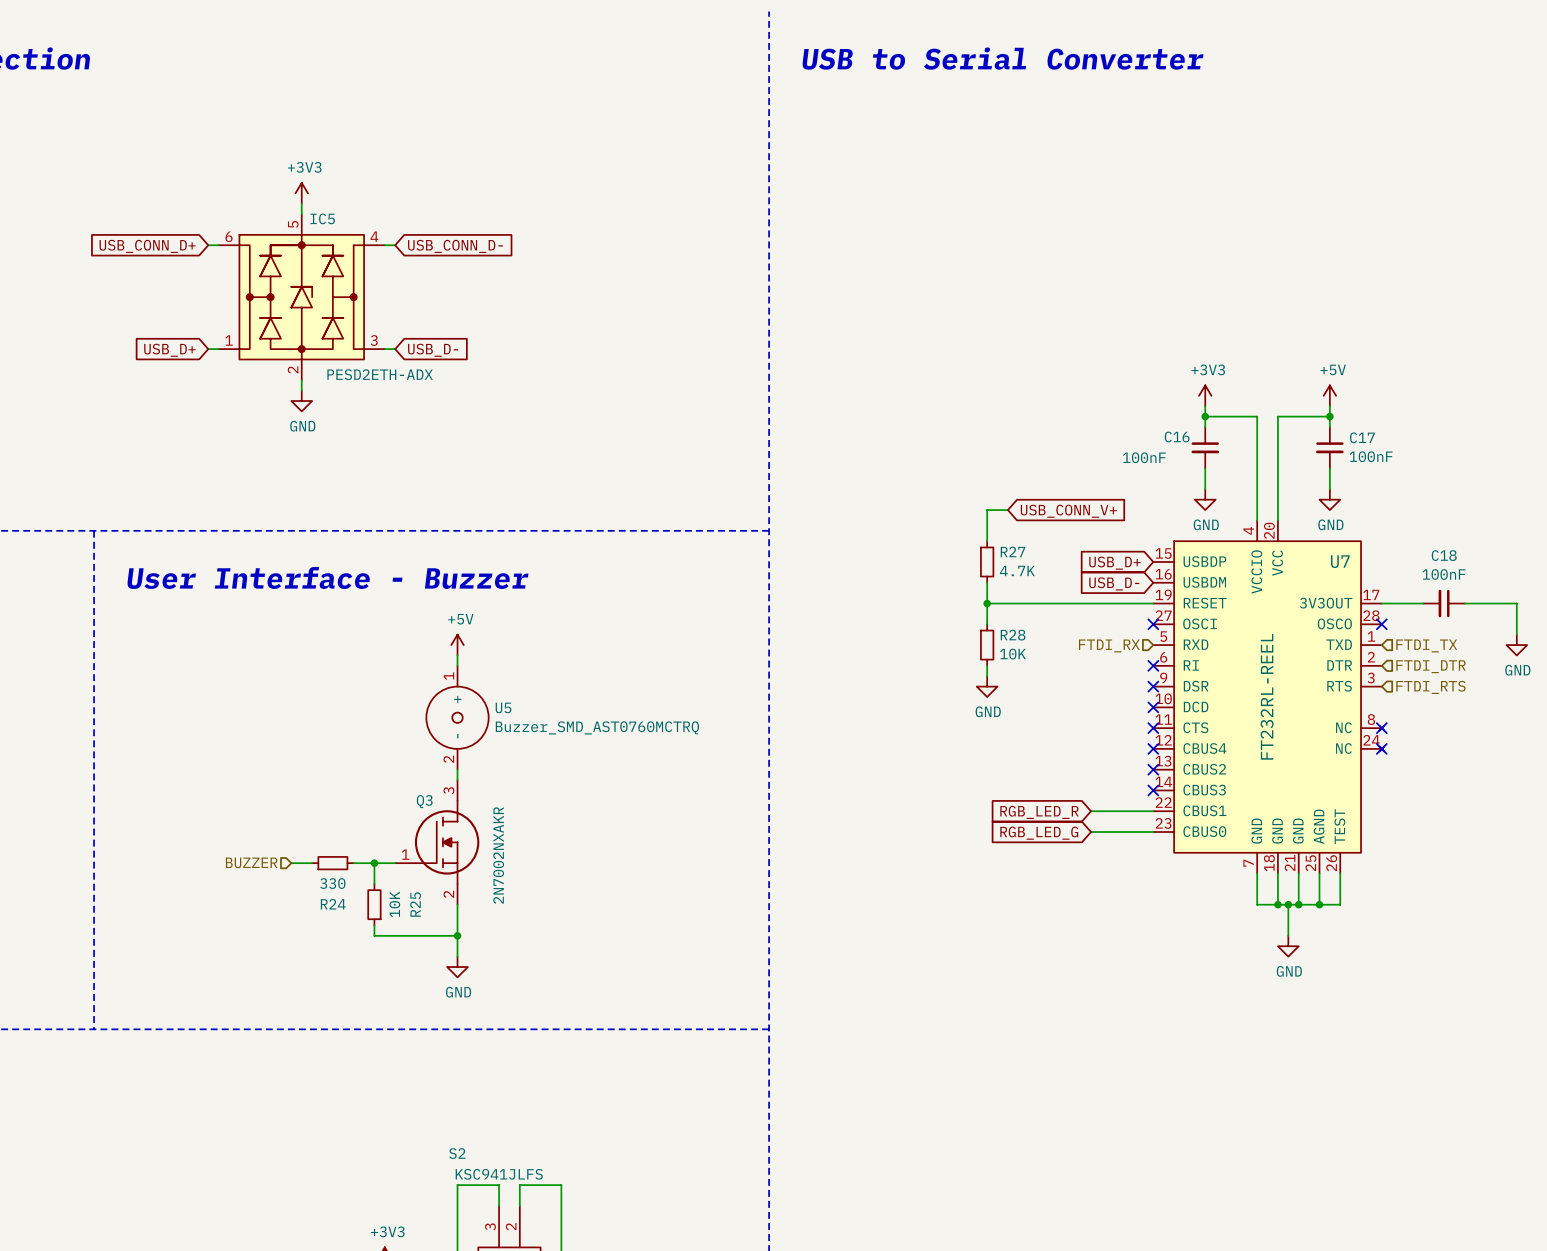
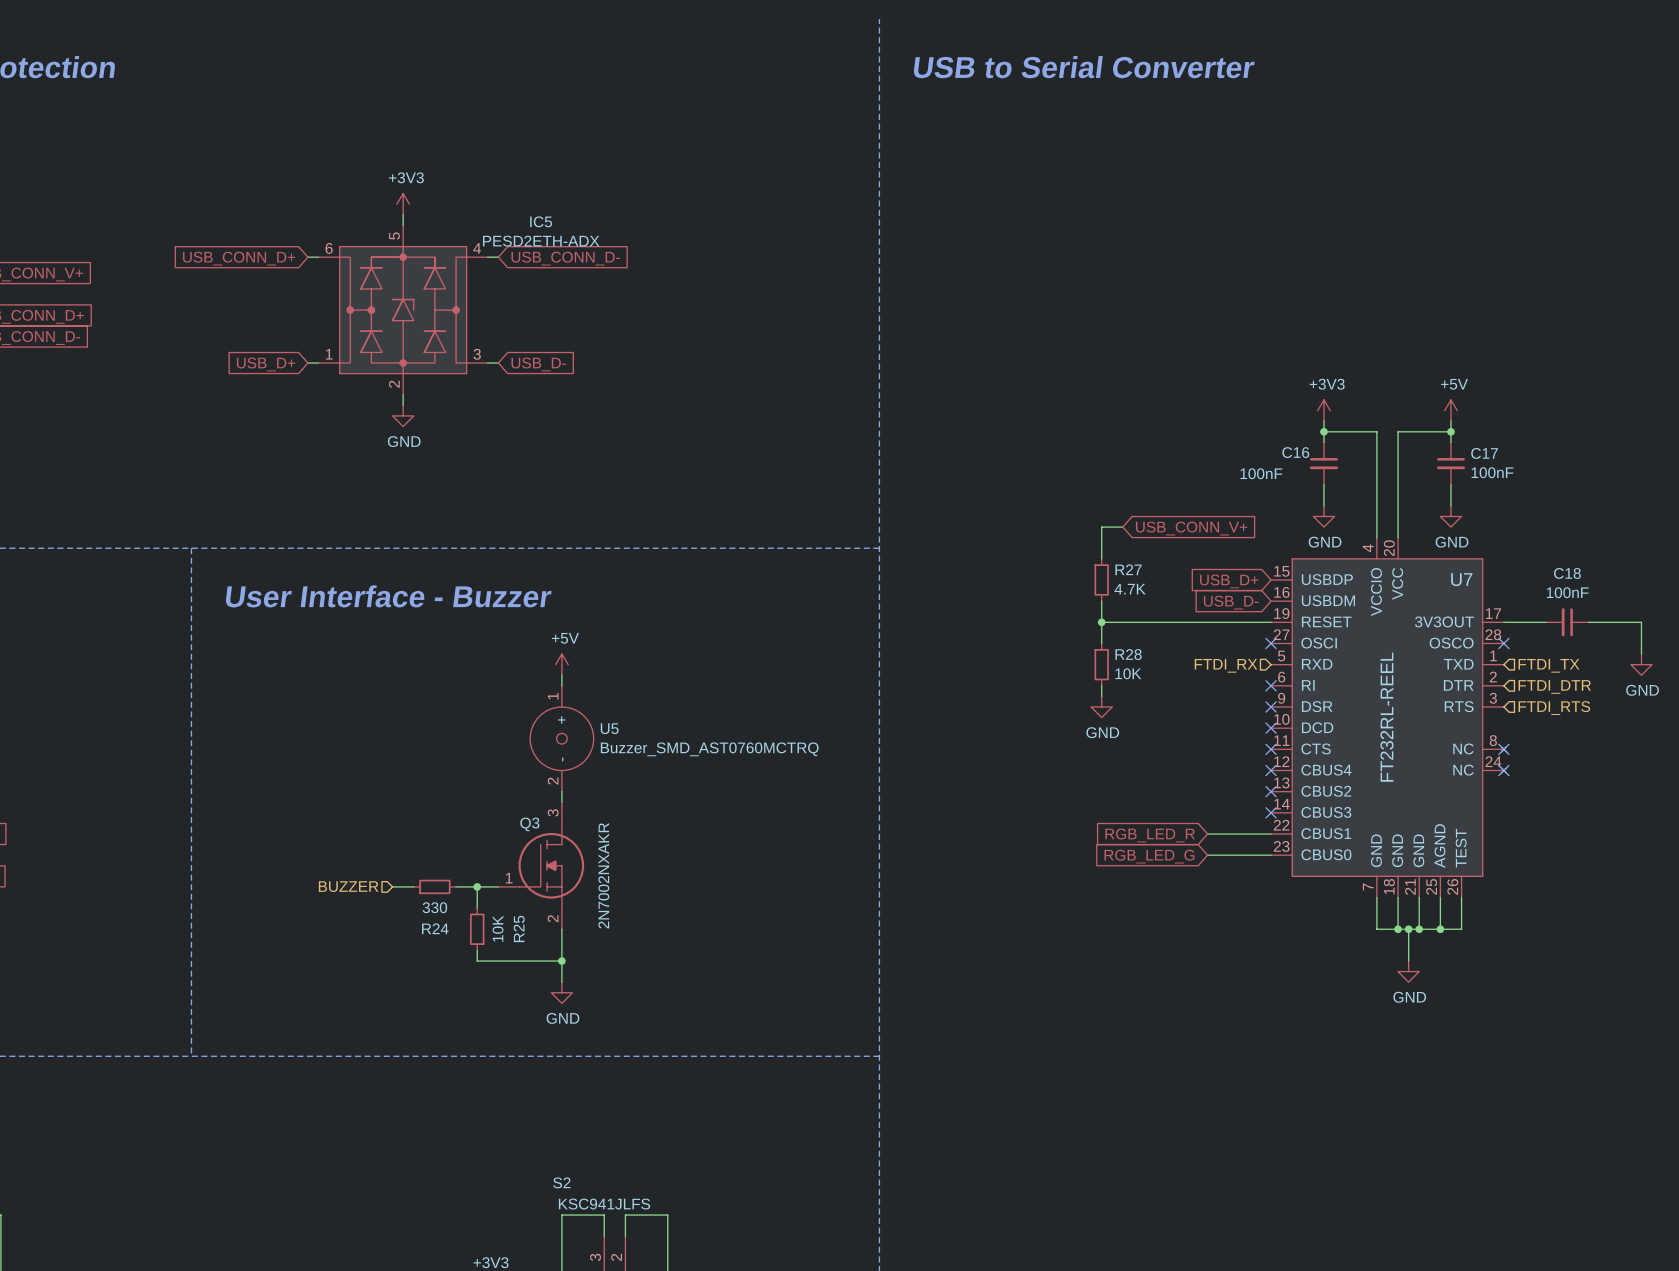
IC5 name position: IC5 (322, 218) -> IC5 (541, 221)
IC5 value position: PESD2ETH-ADX (380, 374) -> PESD2ETH-ADX (541, 241)

